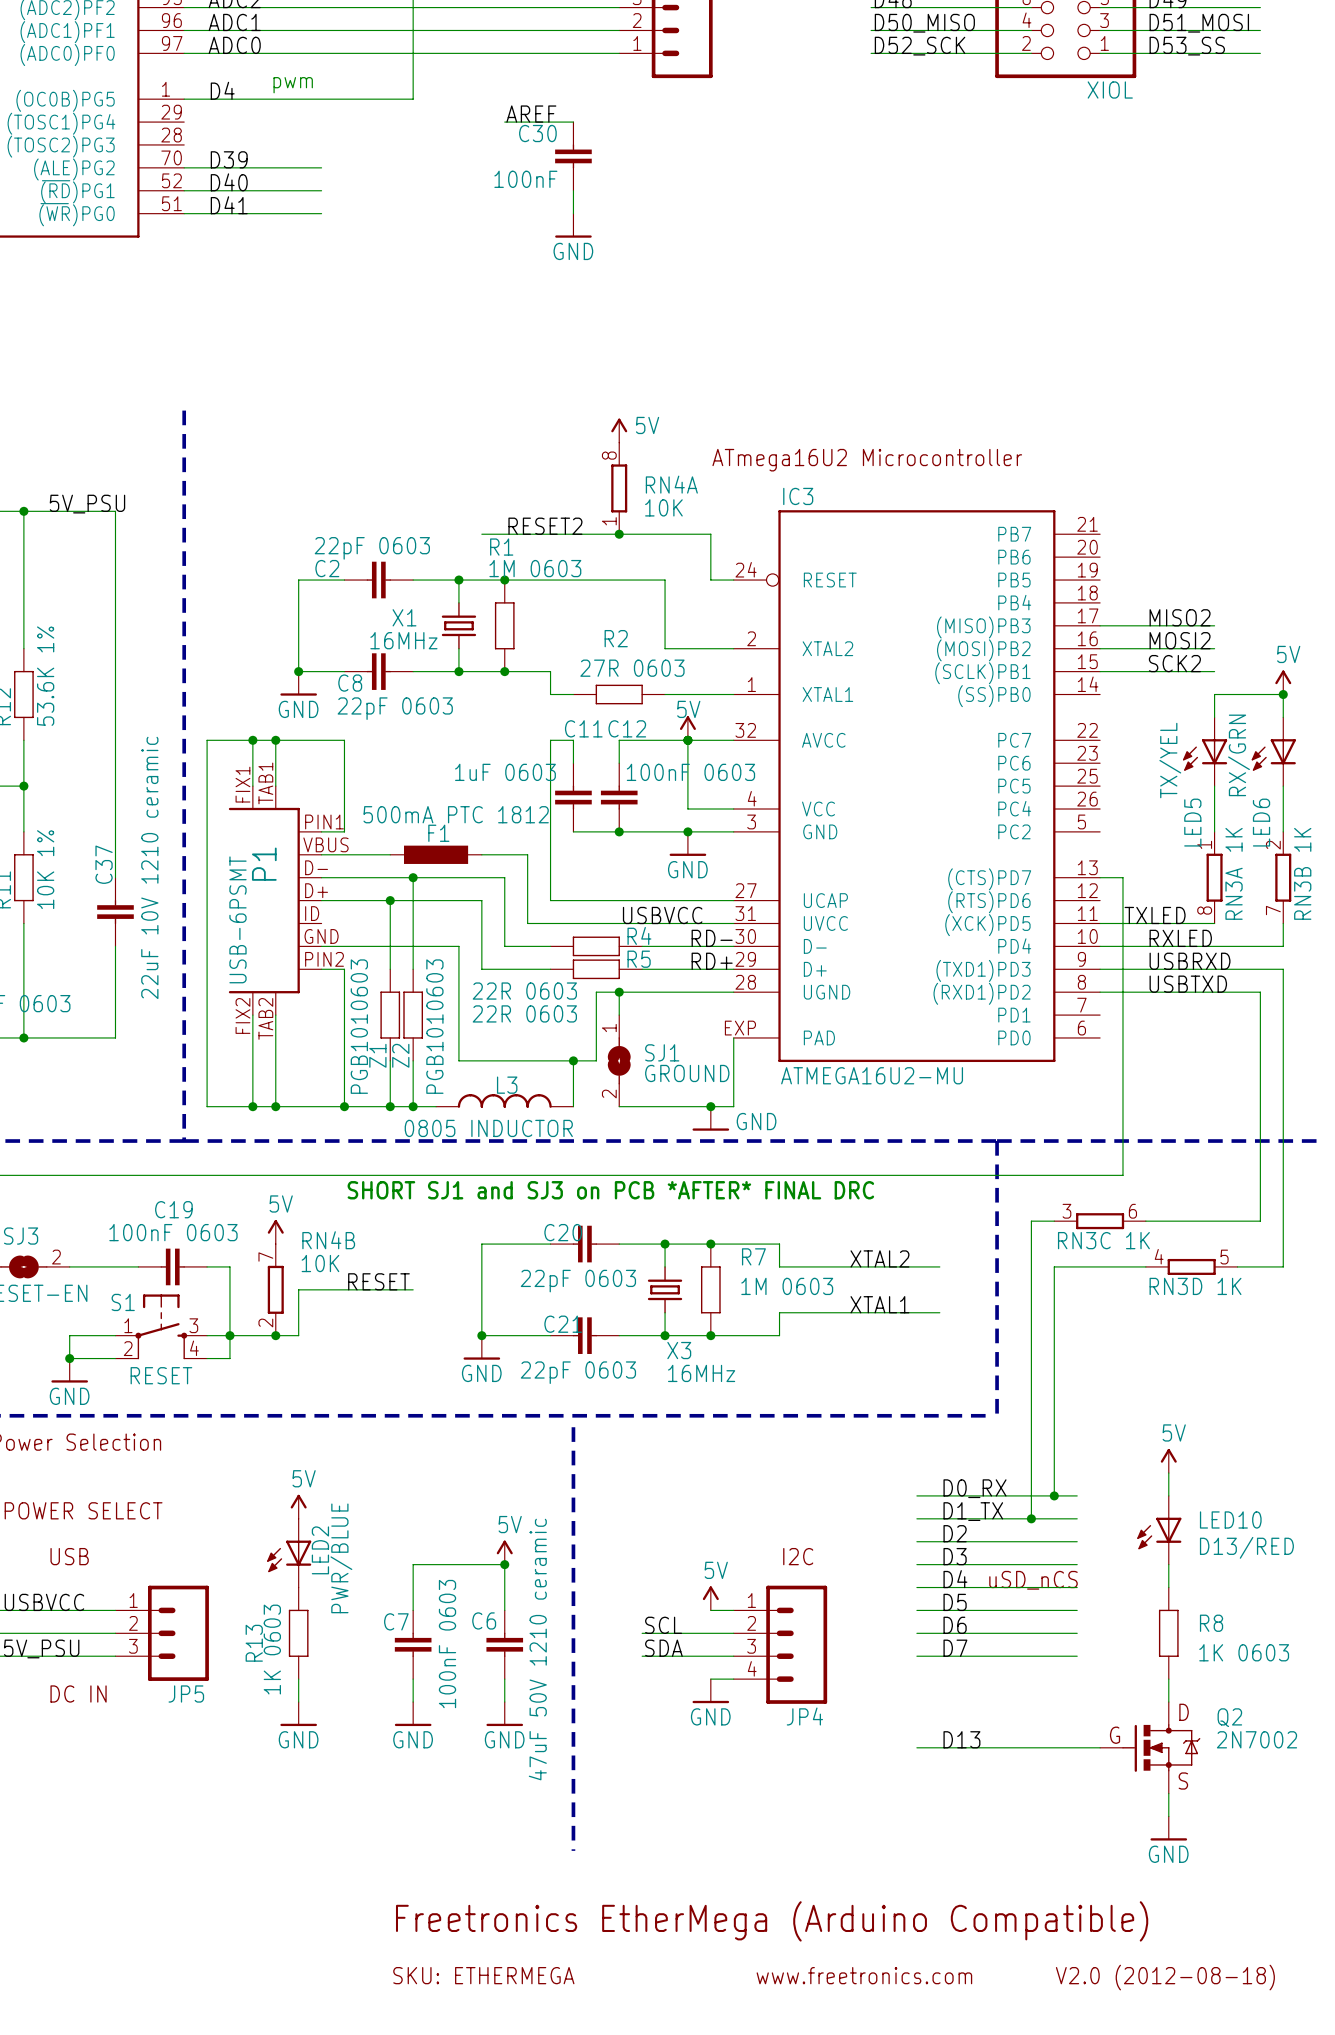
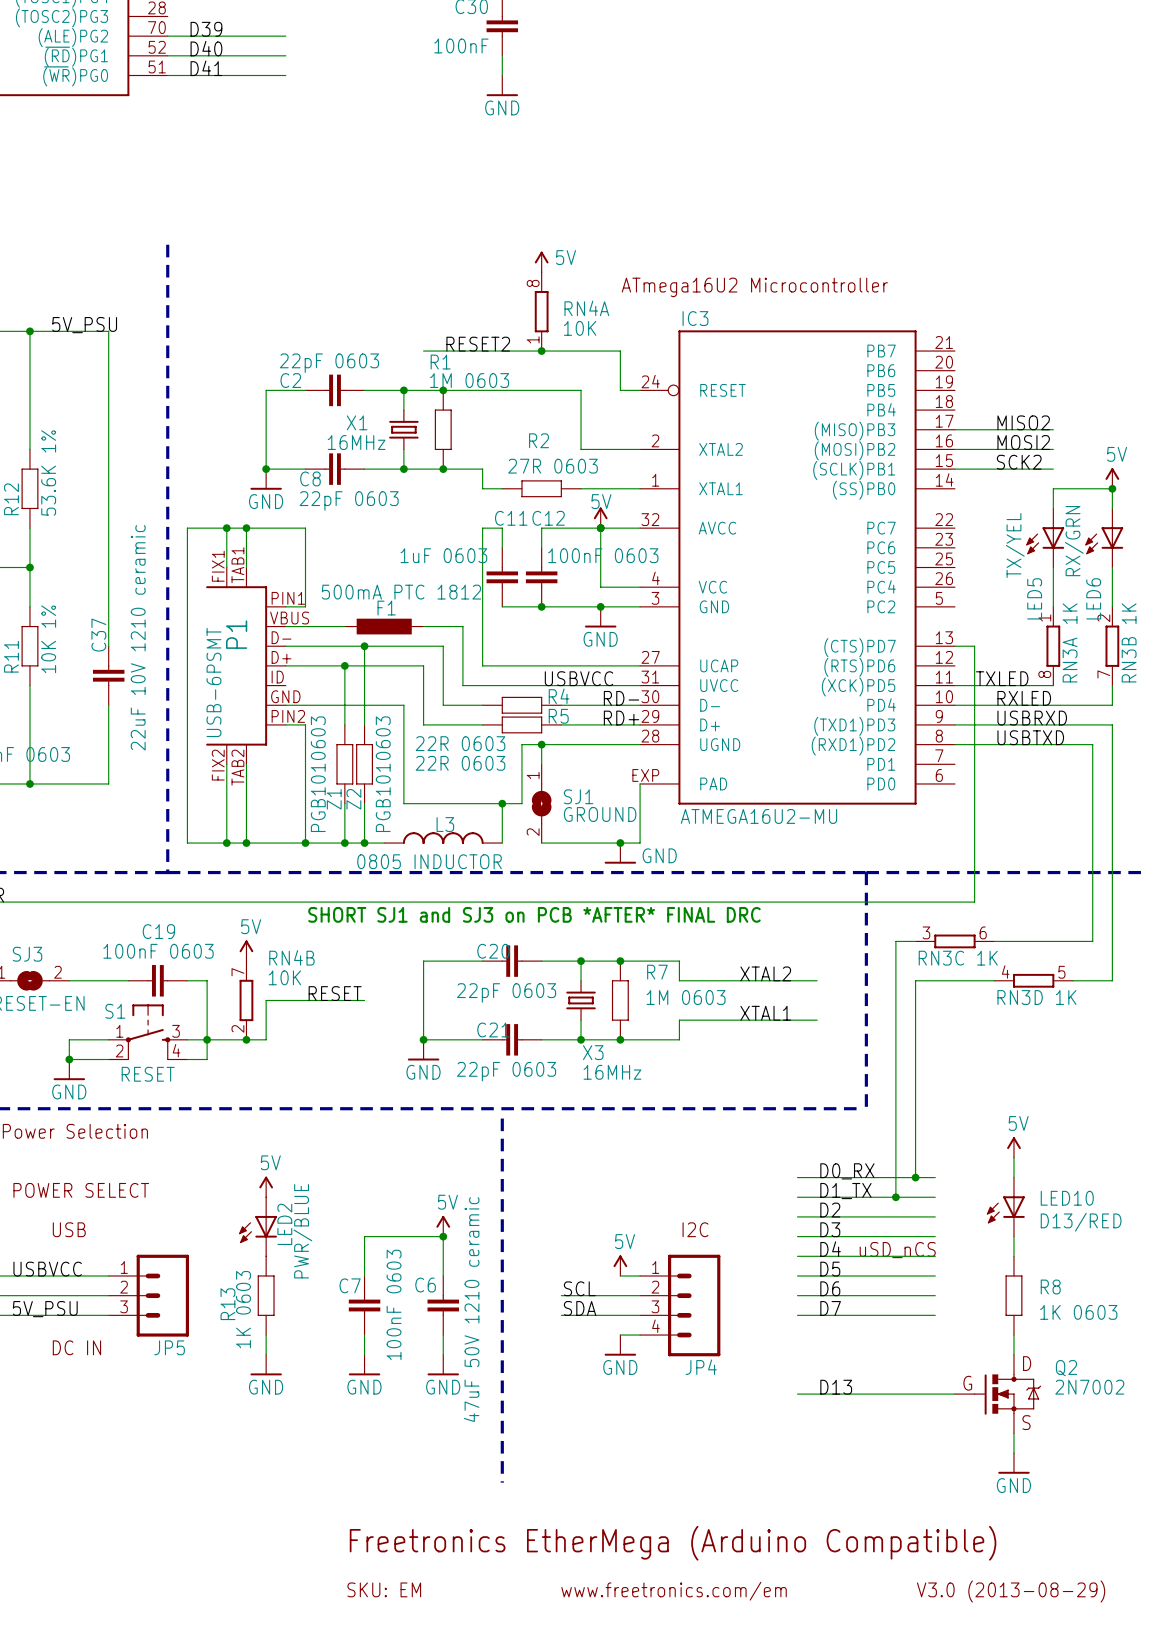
text: SKU: ETHERMEGA (483, 1975) -> SKU: EM (384, 1589)
text: www.freetronics.com (864, 1975) -> www.freetronics.com/em (674, 1591)
text: V2.0 (2012-08-18) (1165, 1977) -> V3.0 (2013-08-29) (1011, 1591)

